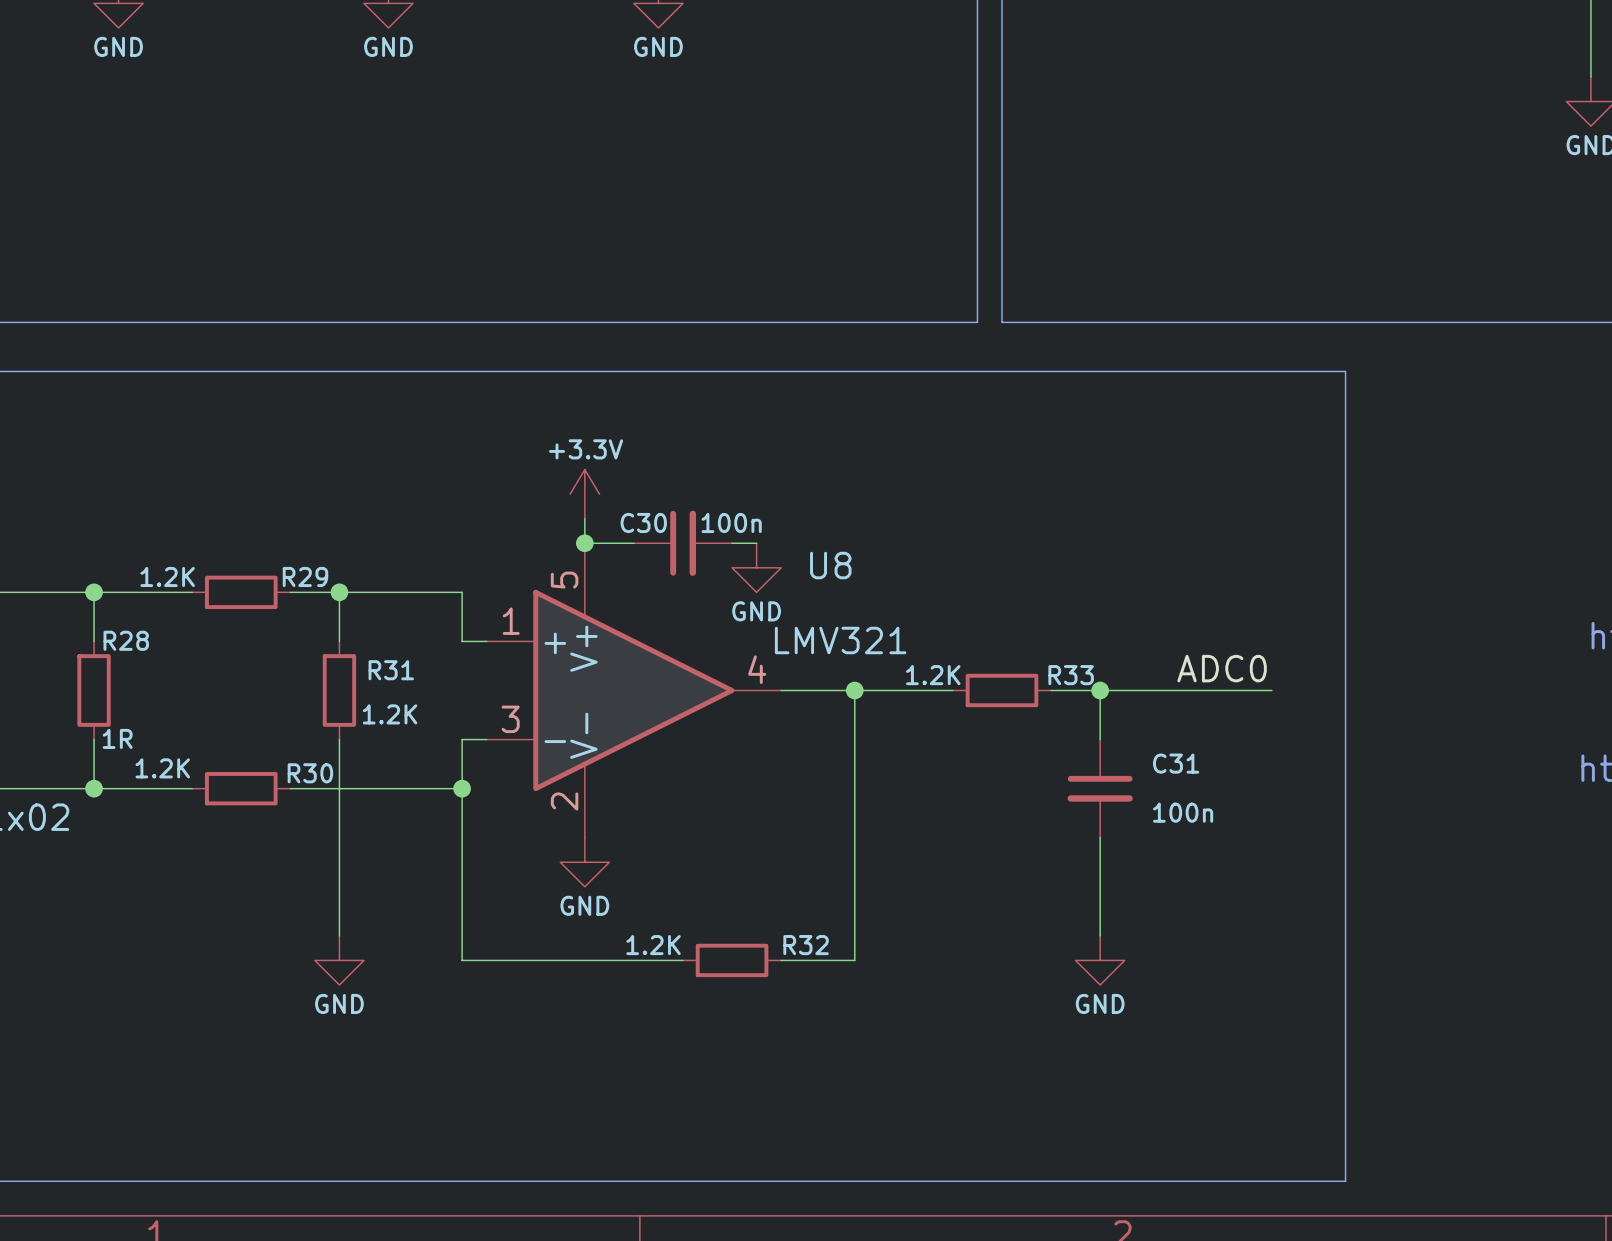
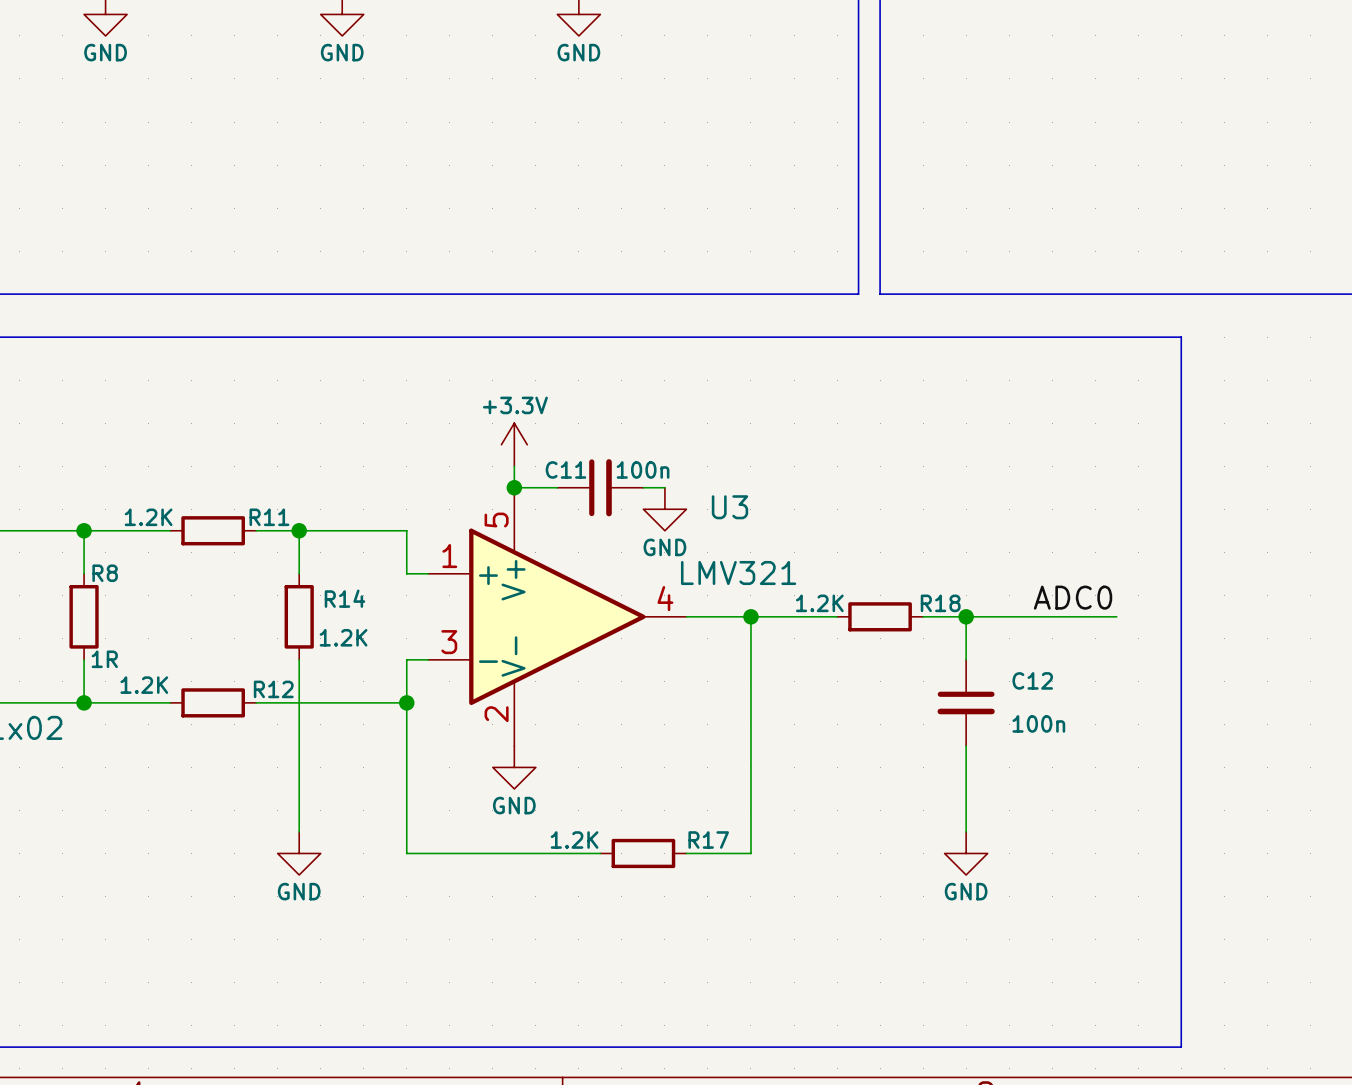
C30 name: C30 (643, 522) -> C11 (565, 469)
U8 name: U8 (830, 565) -> U3 (729, 507)
R29 name: R29 (305, 576) -> R11 (269, 517)
R28 name: R28 (126, 640) -> R8 (105, 573)
R31 name: R31 (391, 670) -> R14 (345, 598)
R33 name: R33 (1071, 675) -> R18 (940, 603)
C31 name: C31 (1176, 763) -> C12 (1032, 680)
R30 name: R30 (310, 773) -> R12 (273, 689)
R32 name: R32 (806, 945) -> R17 (708, 840)

